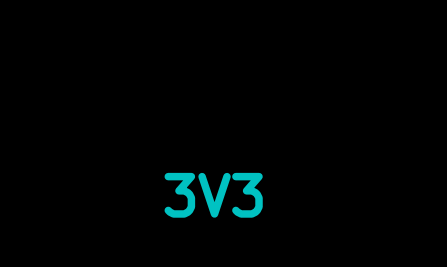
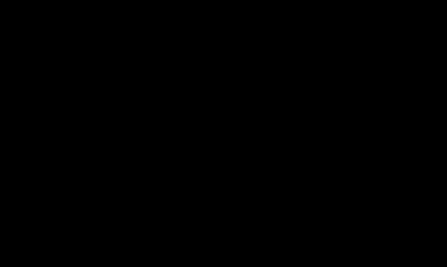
text: 3V3 (213, 195) -> none

